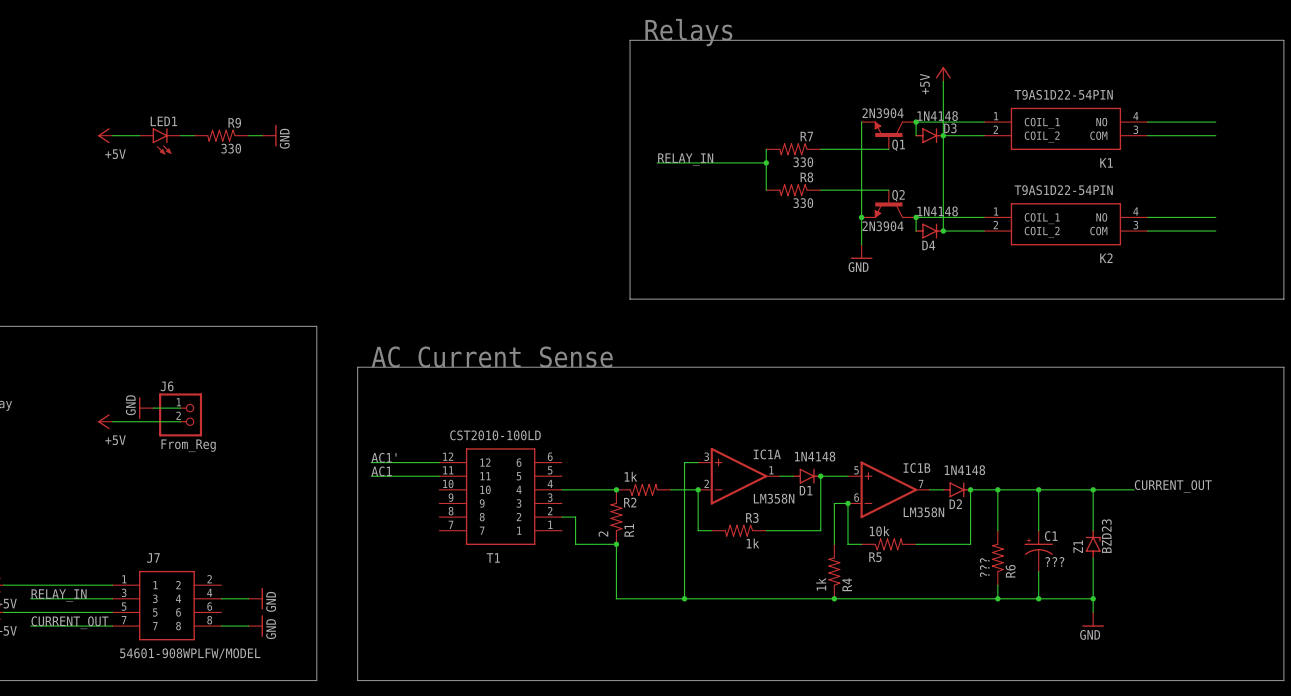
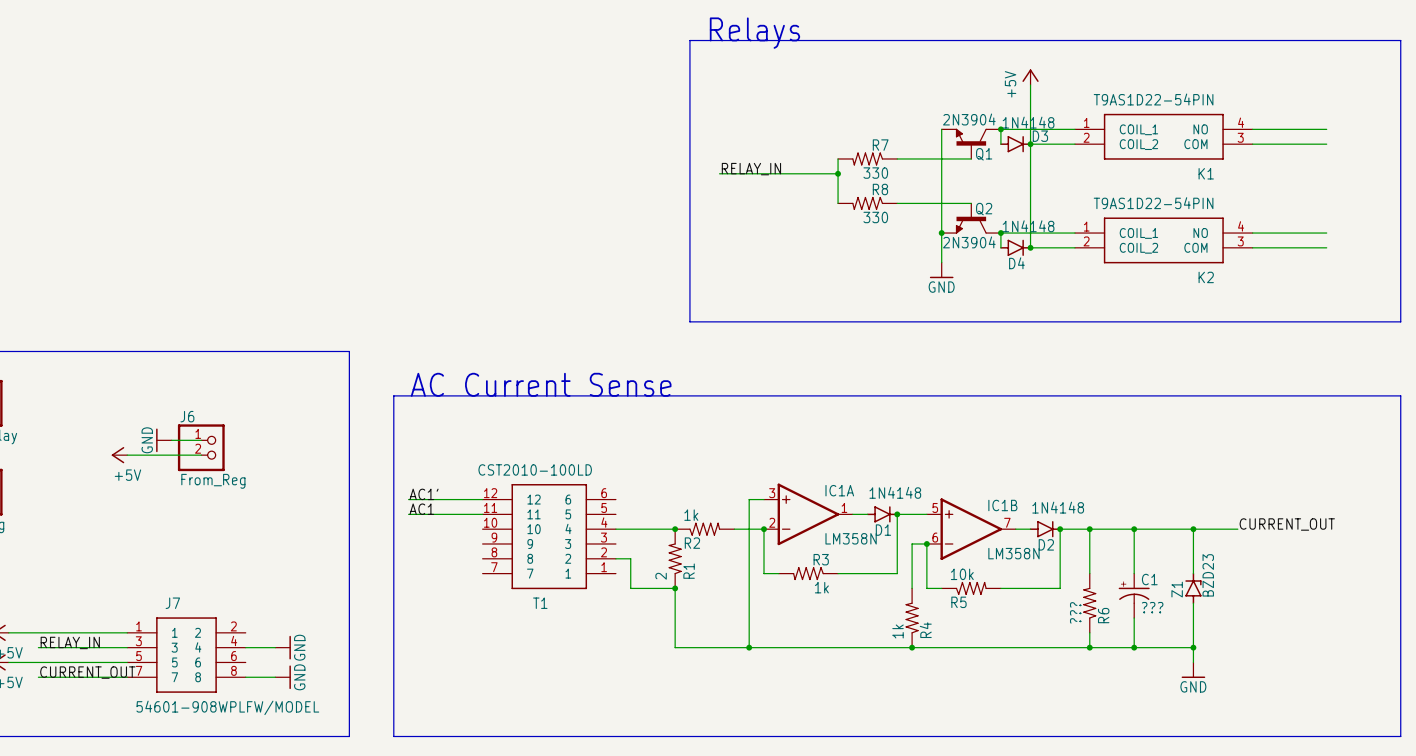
power symbol: +5V (105, 135) -> none
wire: (112, 135) (139, 135) -> none
wire: (180, 135) (194, 135) -> none
R9: 330 (221, 135) -> none
wire: (248, 135) (262, 135) -> none
power symbol: GND (269, 135) -> none
LED1: (160, 141) -> none

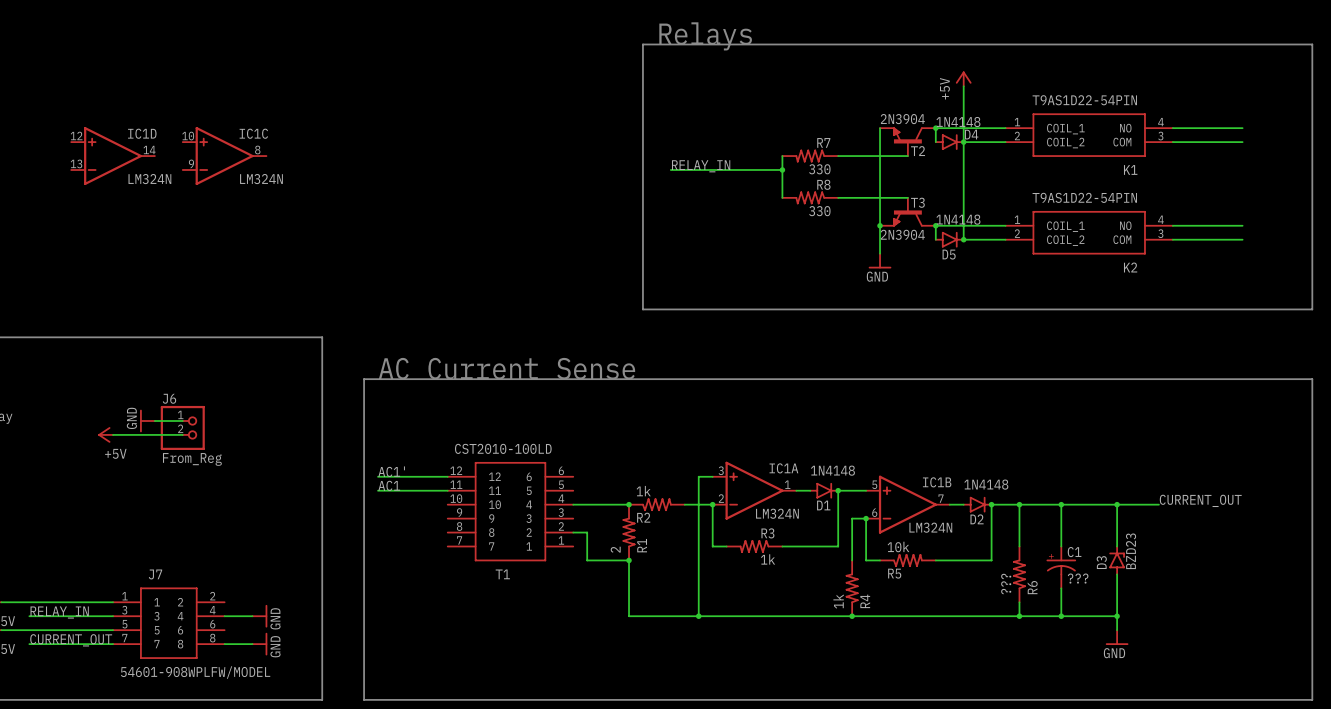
D3 name: D3 (1040, 136) -> D4 (971, 134)
Q1 name: Q1 (984, 154) -> T2 (918, 151)
IC1D: none -> LM324N (113, 156)
IC1C: none -> LM324N (224, 156)
Q2 name: Q2 (984, 209) -> T3 (917, 202)
D4 name: D4 (1016, 263) -> D5 (949, 254)
IC1A value: LM358N (851, 538) -> LM324N (777, 513)
IC1B value: LM358N (1013, 553) -> LM324N (930, 527)
Z1 name: Z1 (1177, 589) -> D3 (1101, 562)

